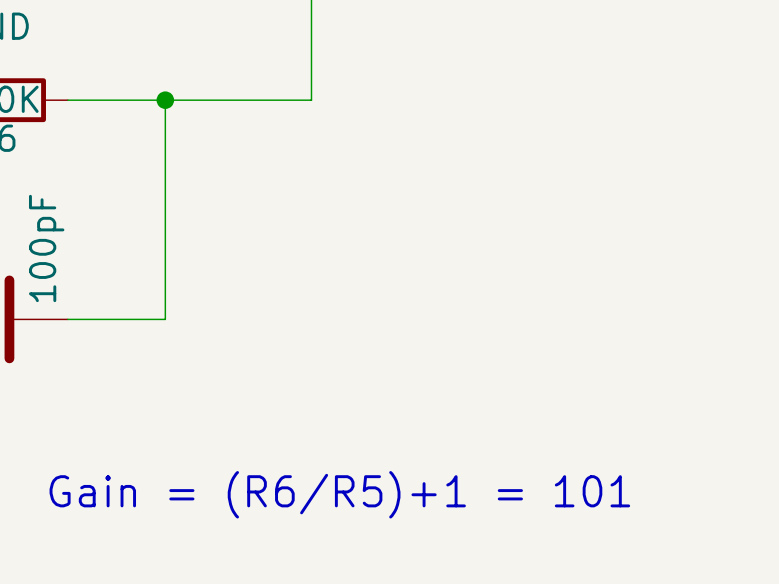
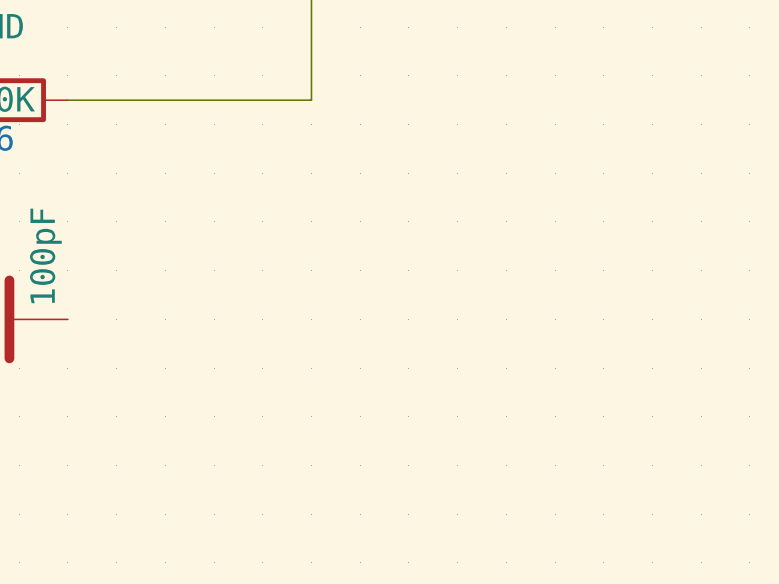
wire: (165, 100) (165, 319) (67, 319) -> none
junction: (165, 100) -> none
text: Gain = (R6/R5)+1 = 101 (339, 494) -> none

